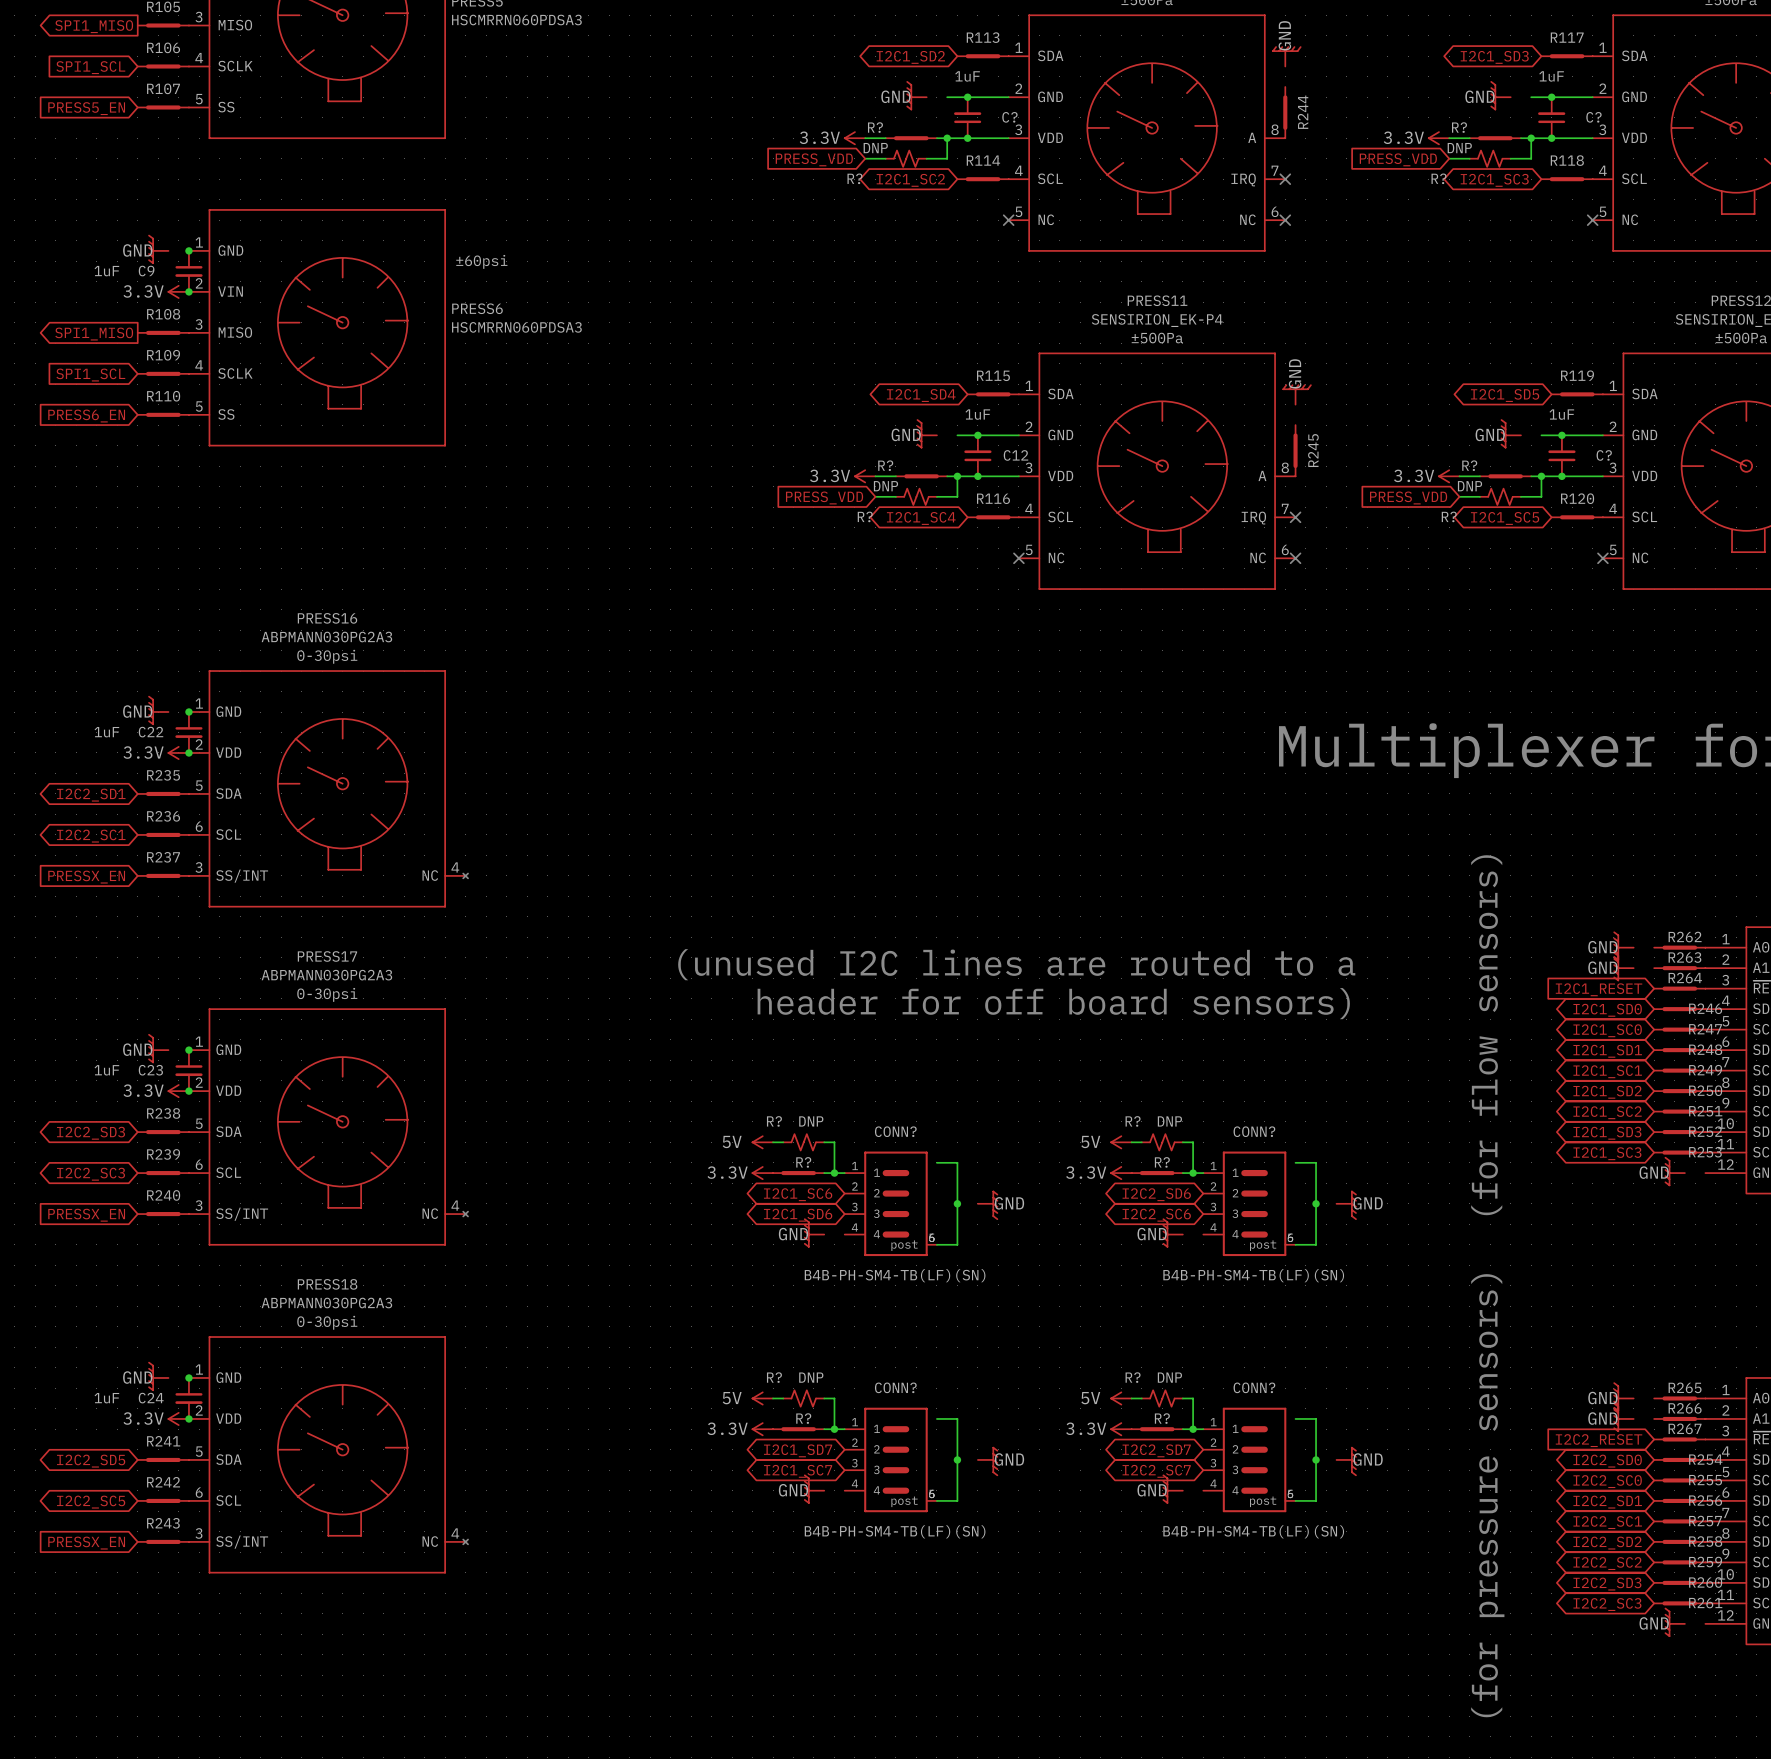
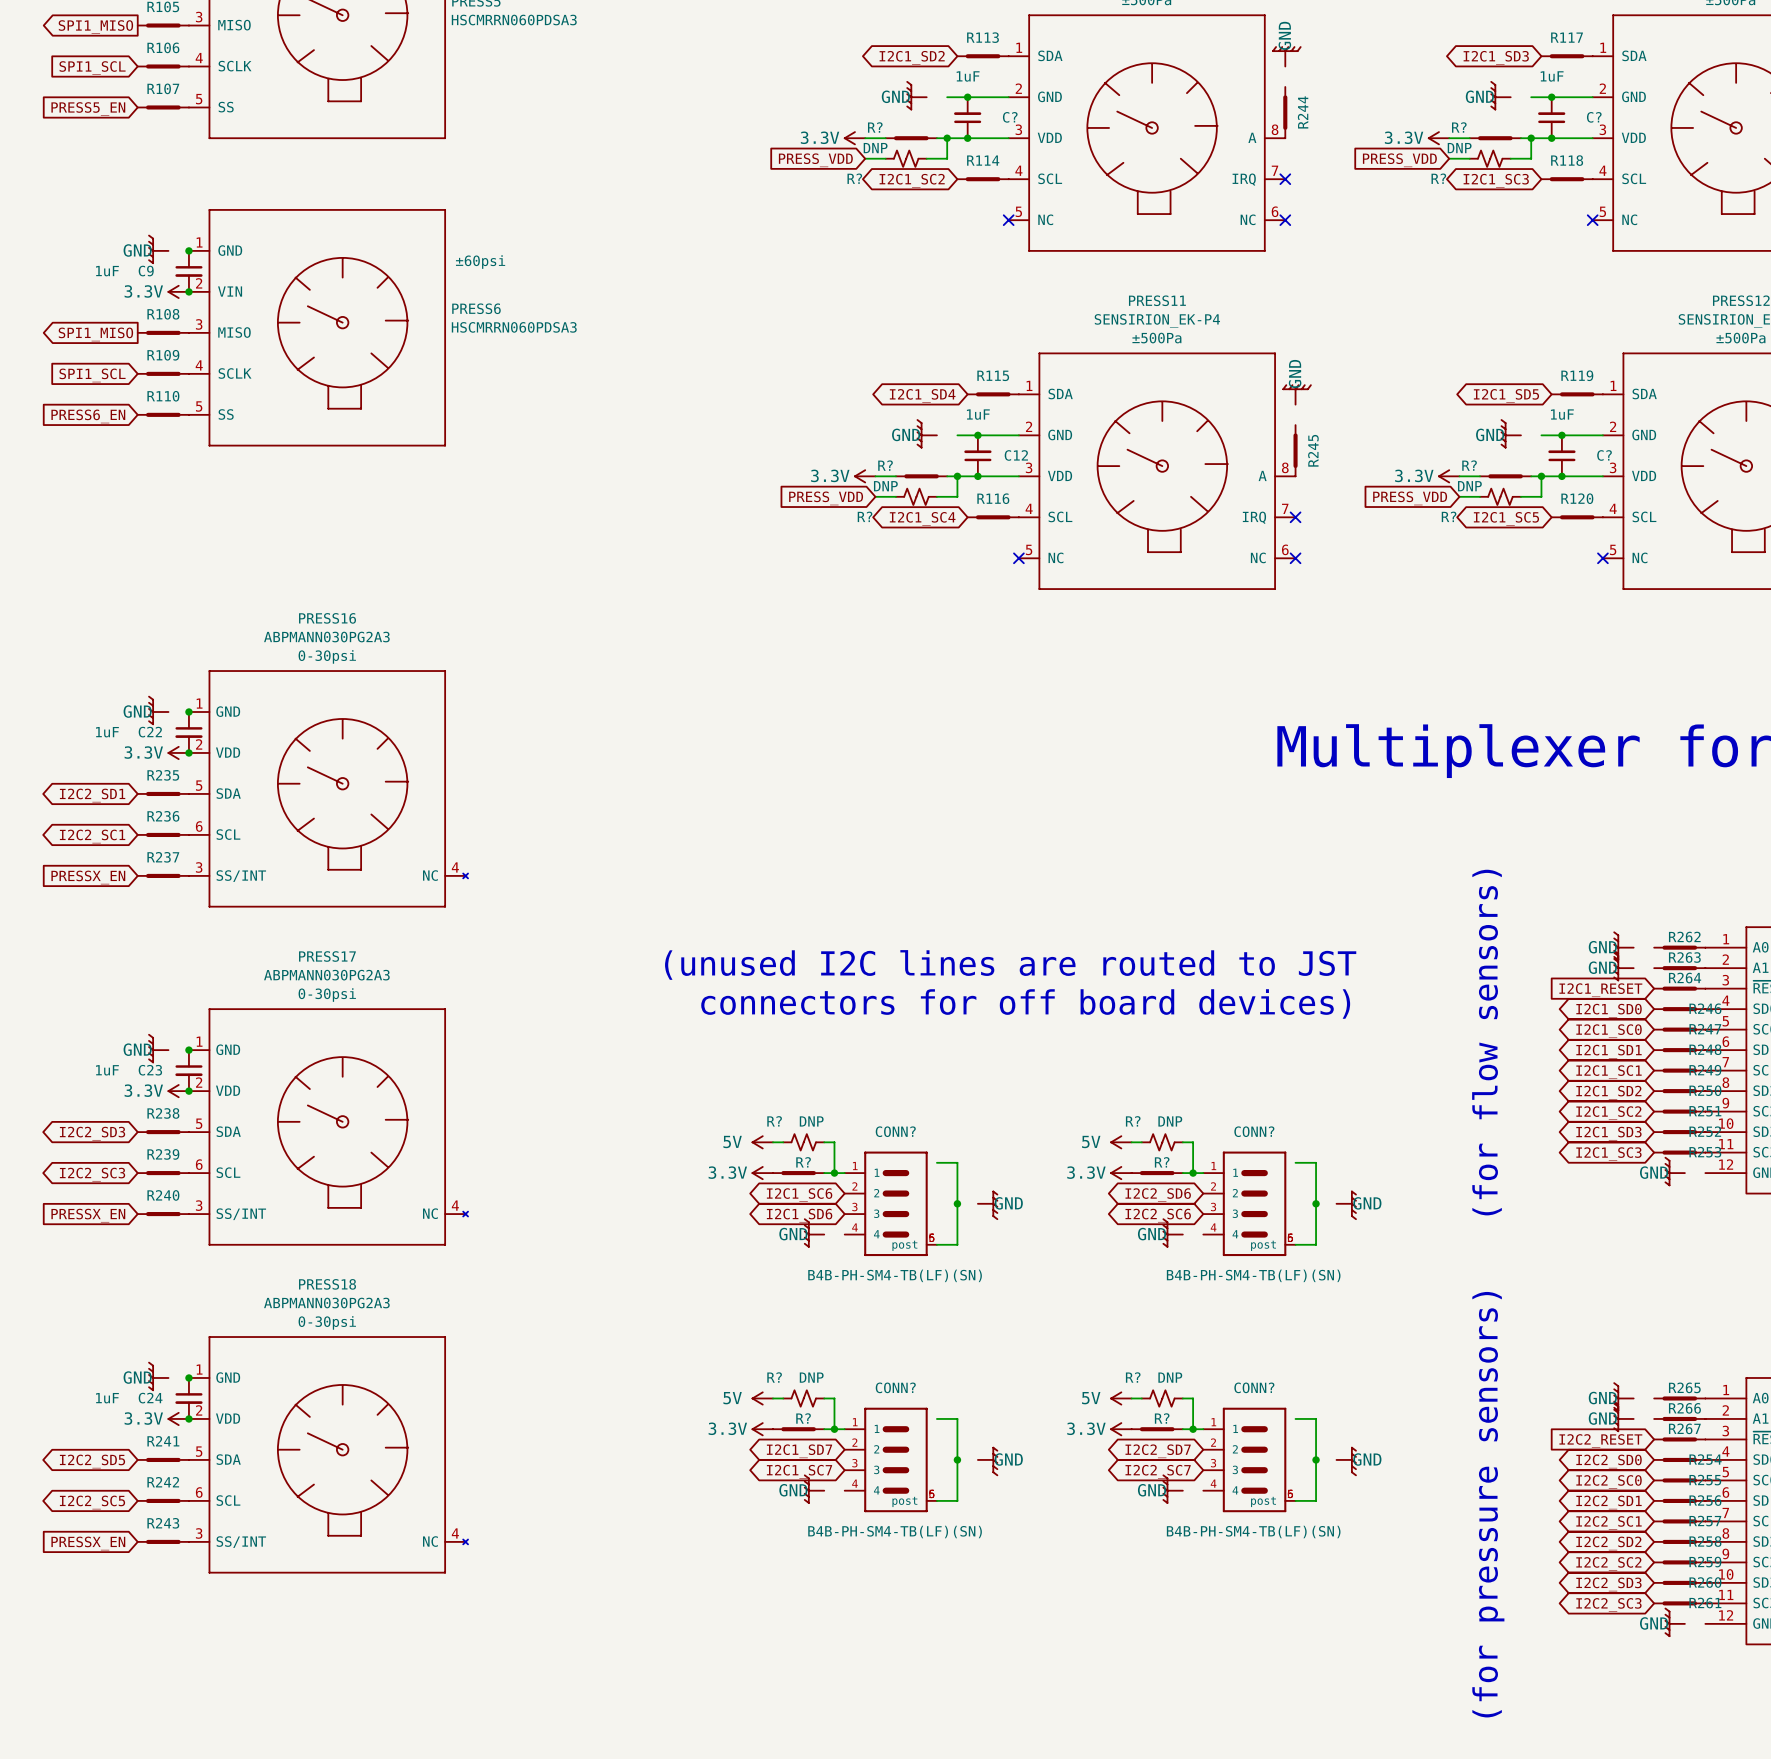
text: (unused I2C lines are routed to a (1016, 964) -> (unused I2C lines are routed to JST (1010, 964)
text: header for off board sensors) (1053, 1003) -> connectors for off board devices) (1025, 1003)

